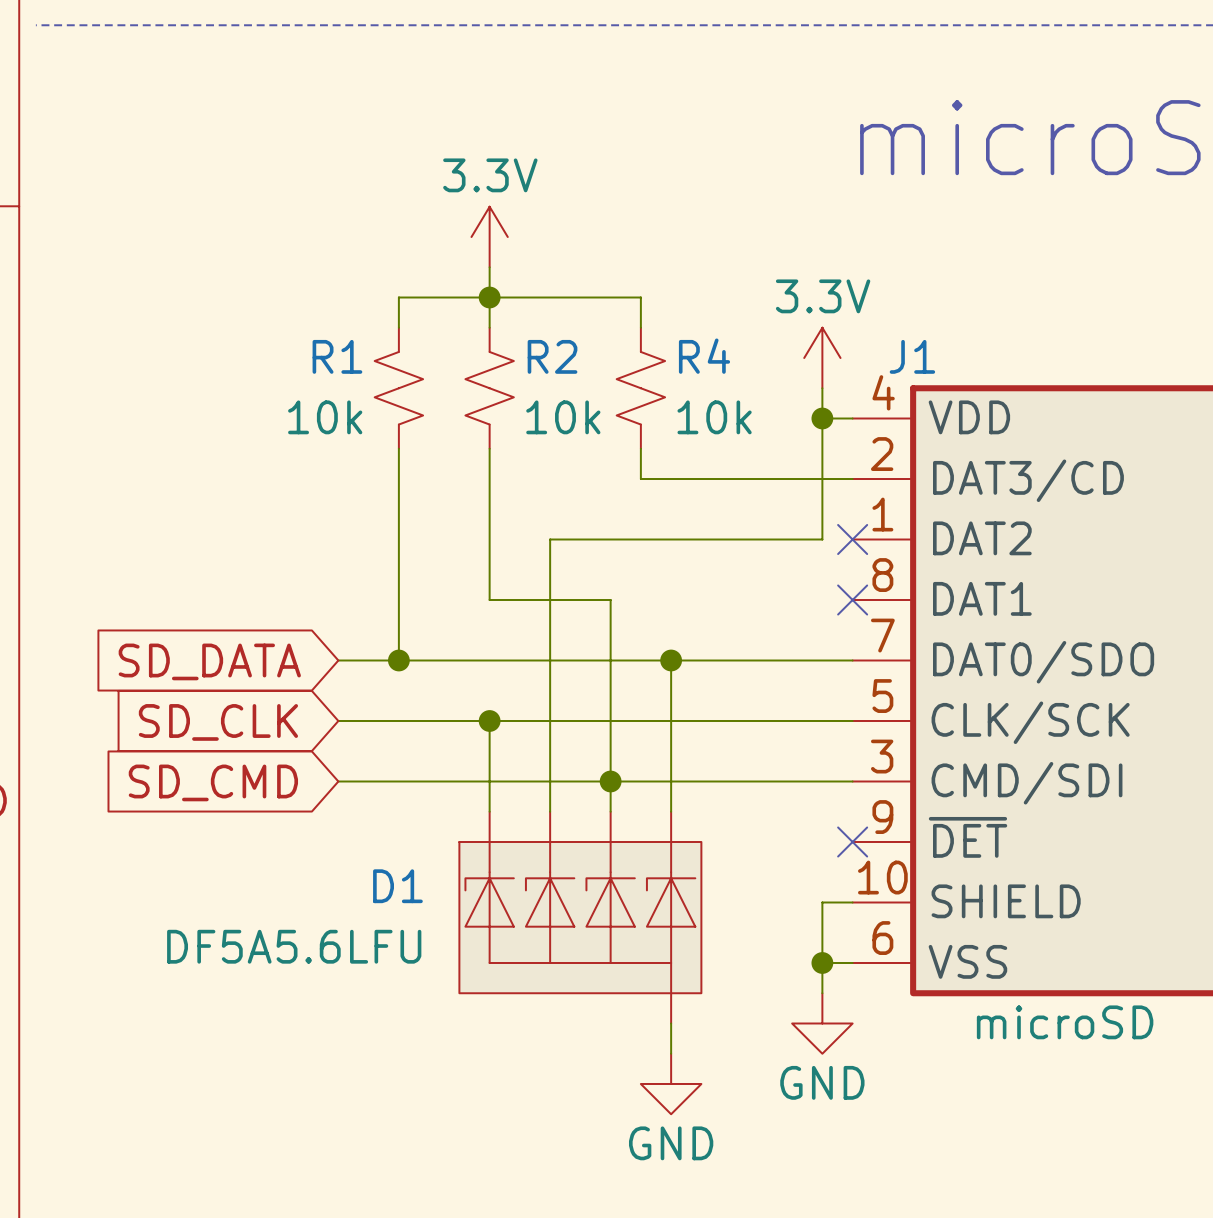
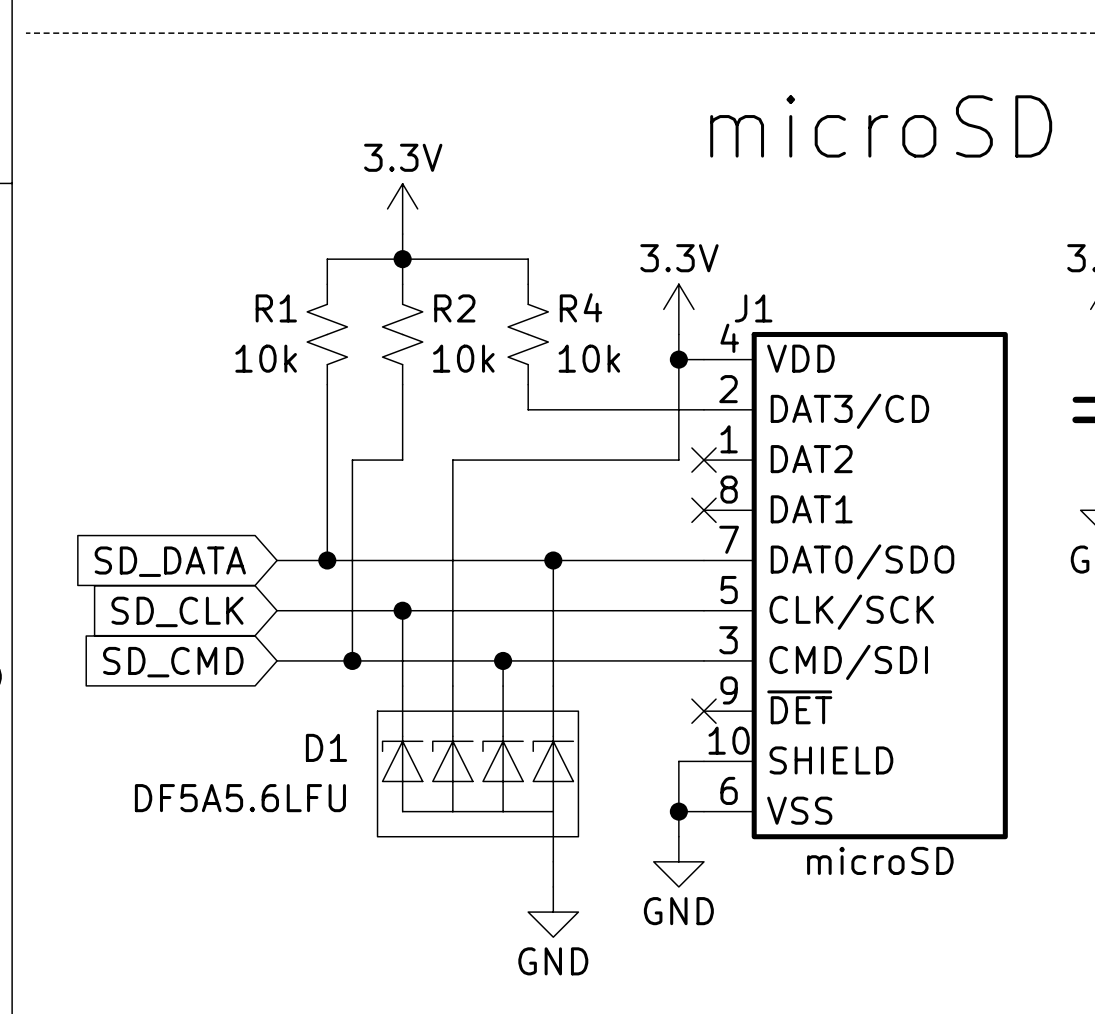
wire: (489, 539) (489, 600) (610, 600) (610, 781) -> (402, 460) (352, 460) (352, 660)
junction: none -> (352, 660)

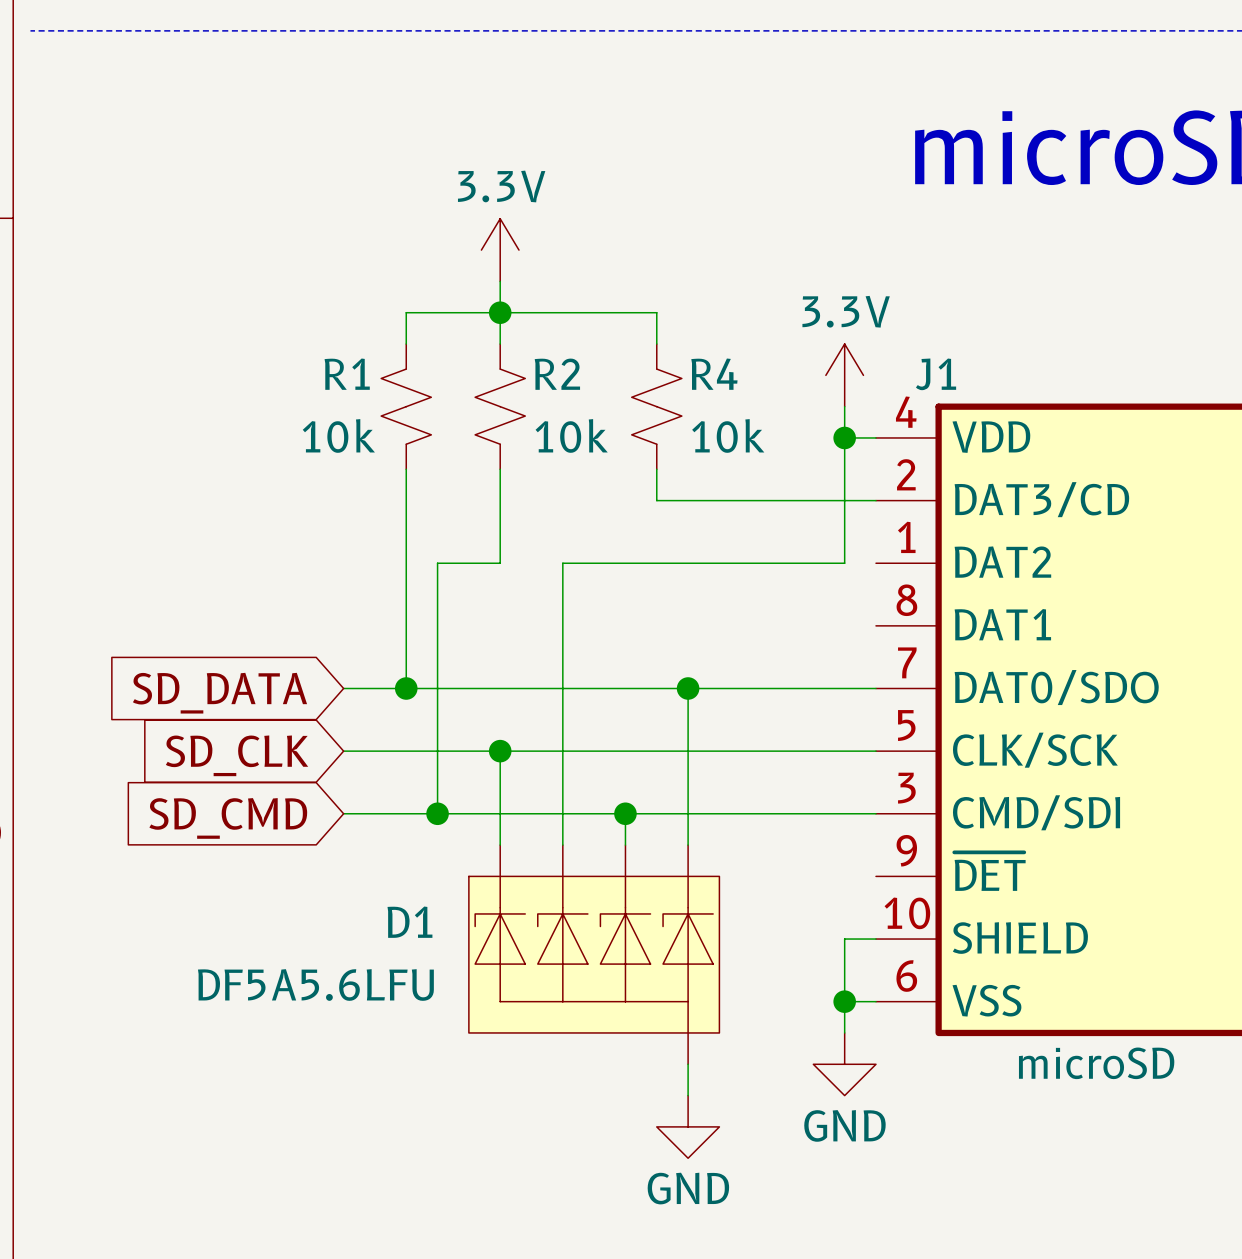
no-connect mark: (703, 460) -> none
no-connect mark: (703, 510) -> none
no-connect mark: (703, 711) -> none

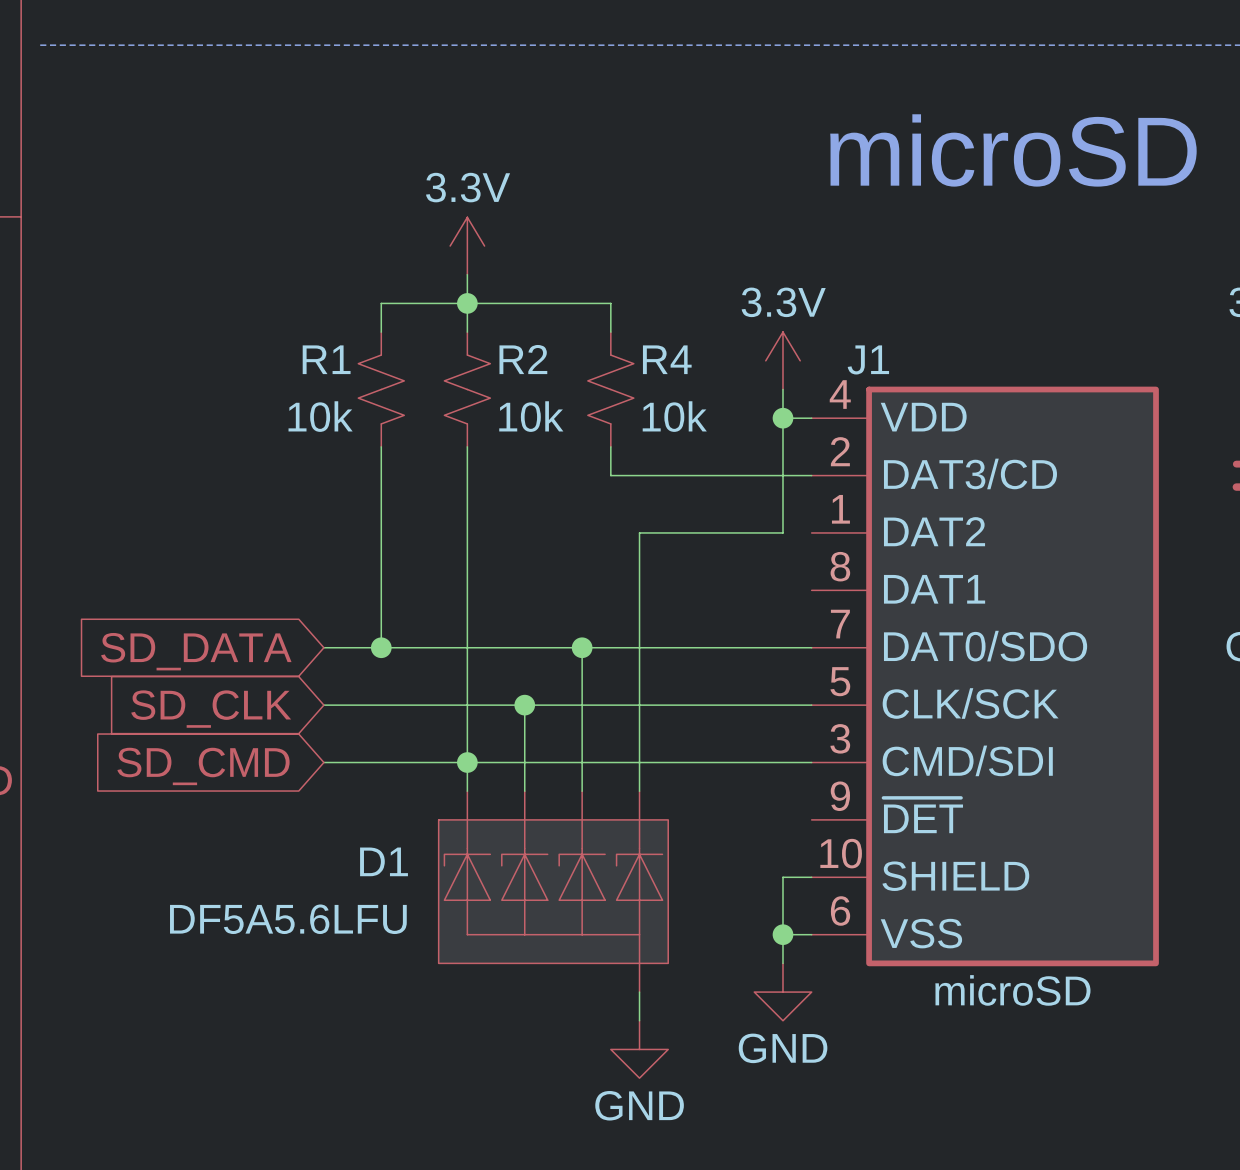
wire: (500, 563) (437, 563) (437, 813) -> (467, 532) (467, 705)
wire: (688, 563) (562, 563) (562, 751) -> (639, 532) (639, 647)
wire: none -> (582, 647) (582, 762)
junction: none -> (582, 647)
junction: (688, 688) -> none
junction: (500, 751) -> none
junction: none -> (524, 705)
junction: (437, 813) -> none
junction: none -> (467, 762)
junction: (625, 813) -> none

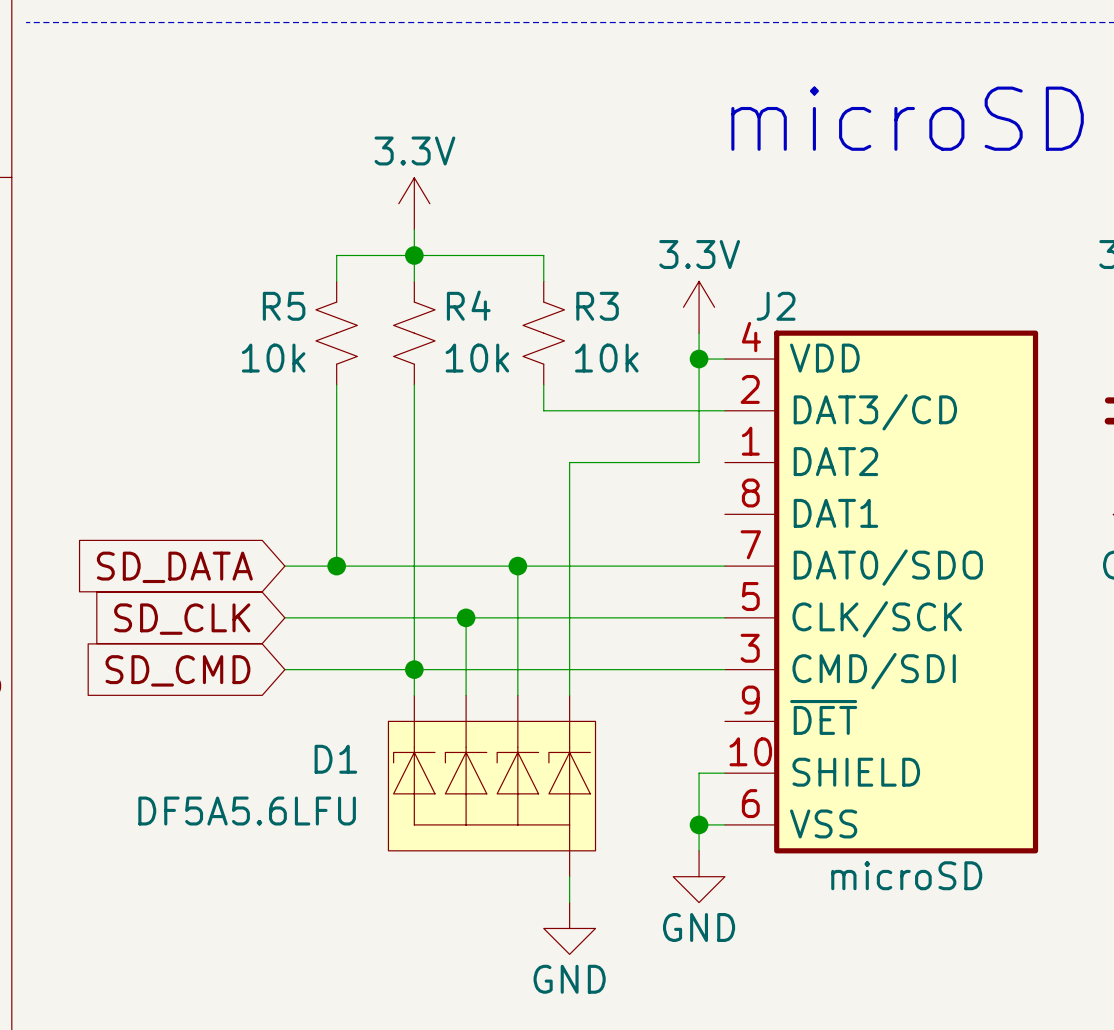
R1 name: R1 (326, 359) -> R5 (284, 306)
R2 name: R2 (523, 359) -> R4 (468, 305)
R4 name: R4 (667, 359) -> R3 (597, 306)
J1 name: J1 (868, 359) -> J2 (776, 306)

